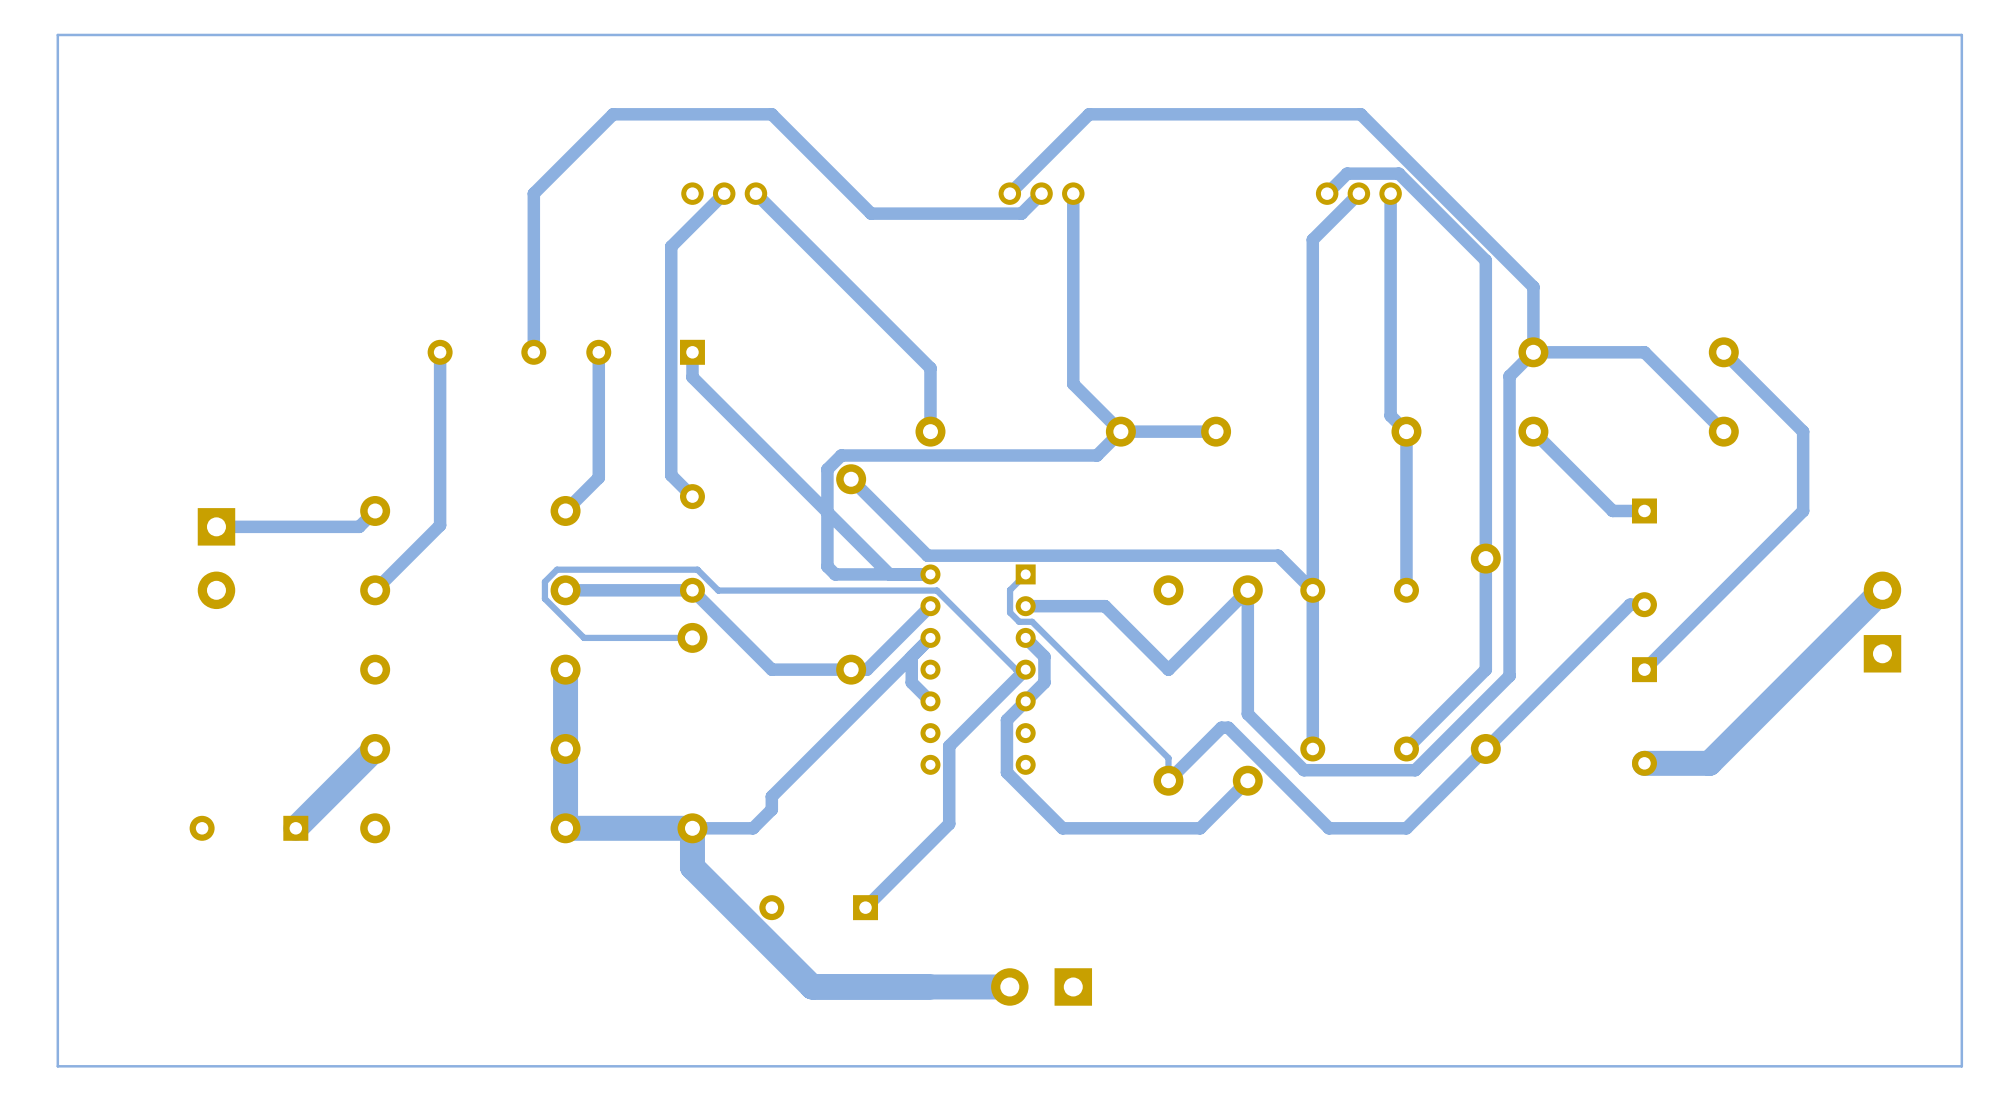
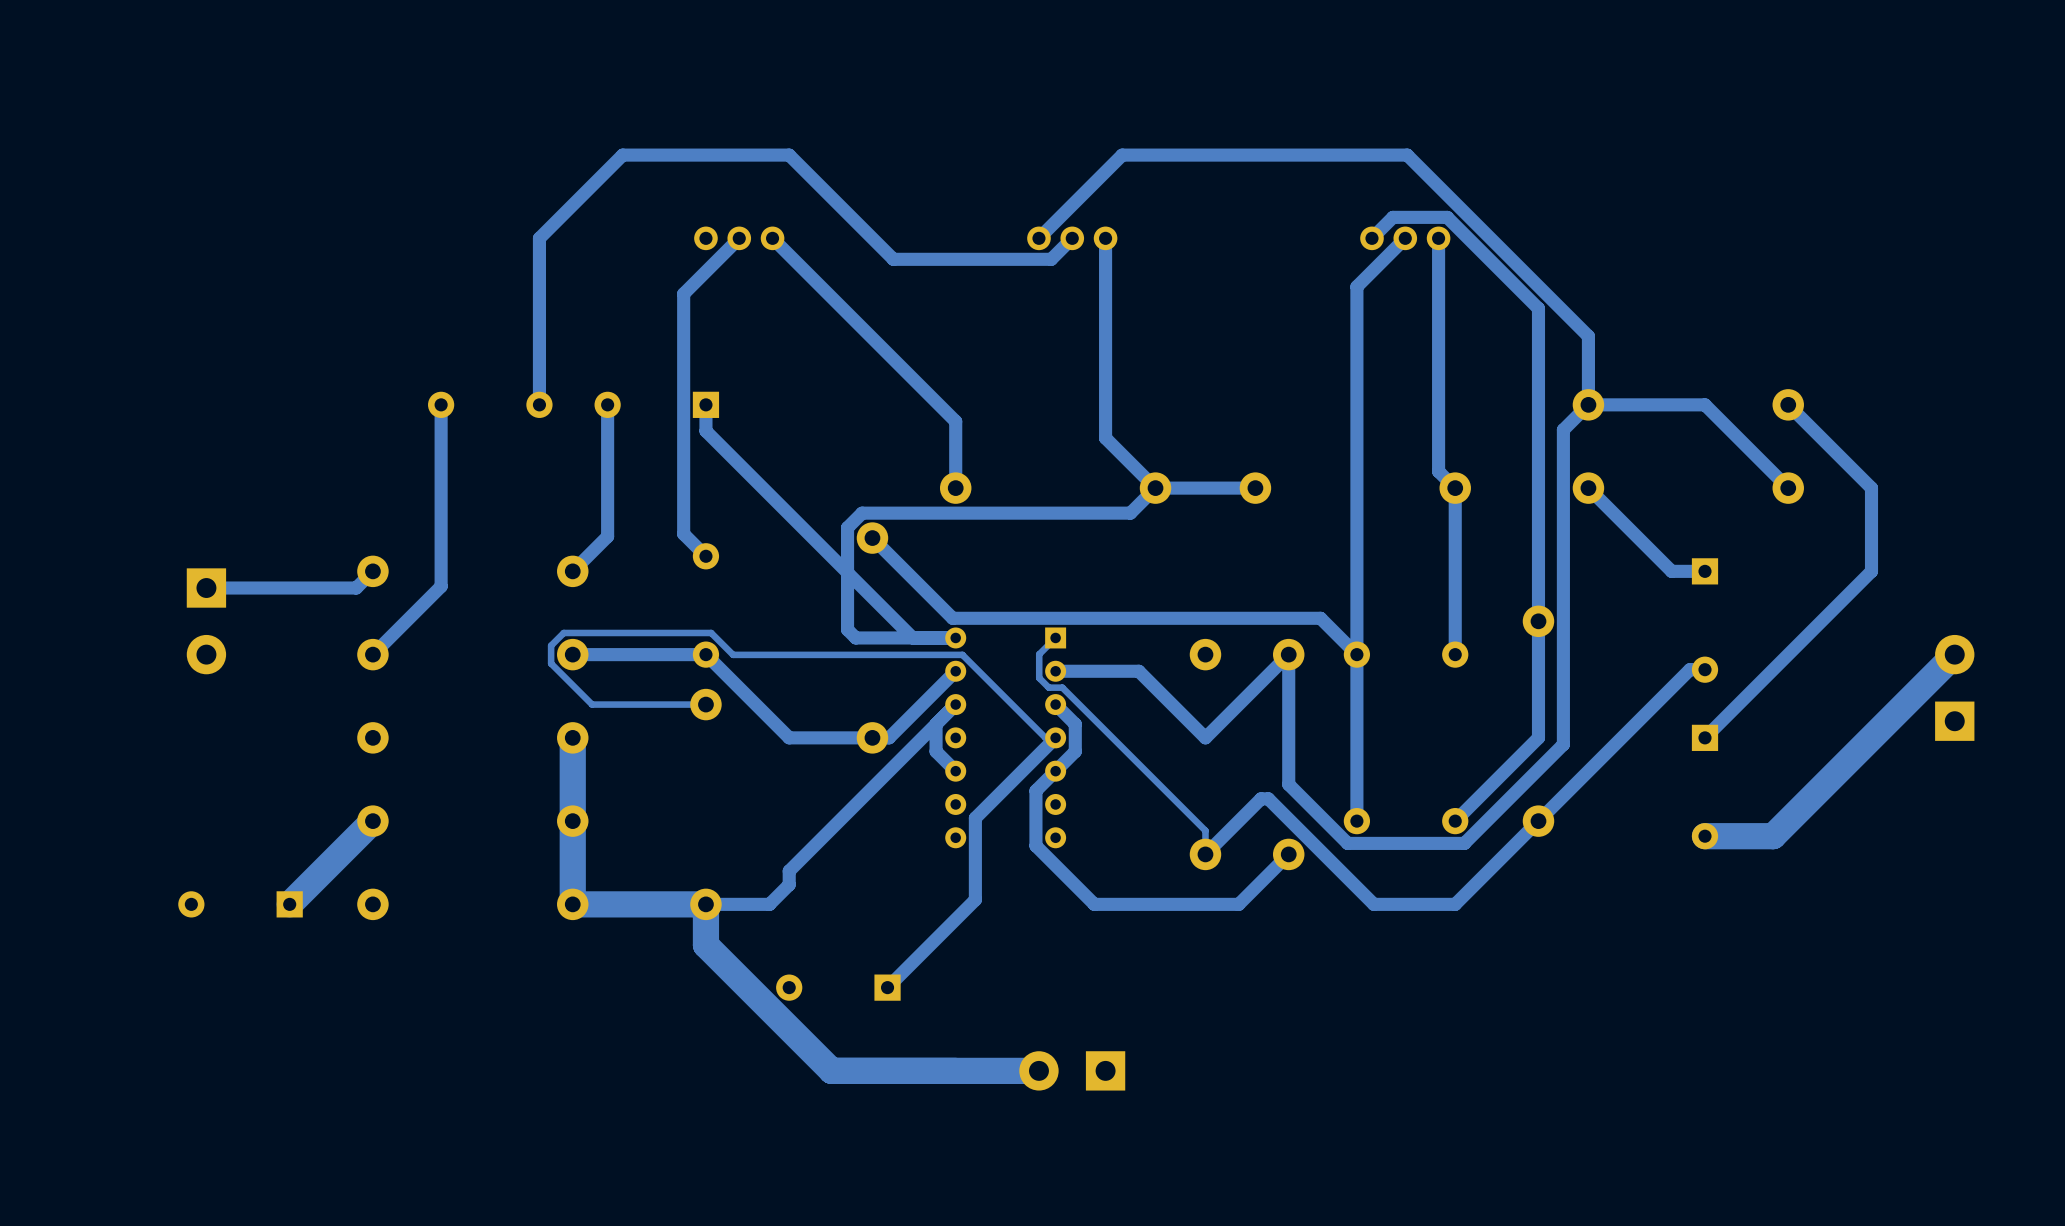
track: (1961, 34) (57, 34) (57, 1066) (1961, 1066) (1961, 34) -> none

